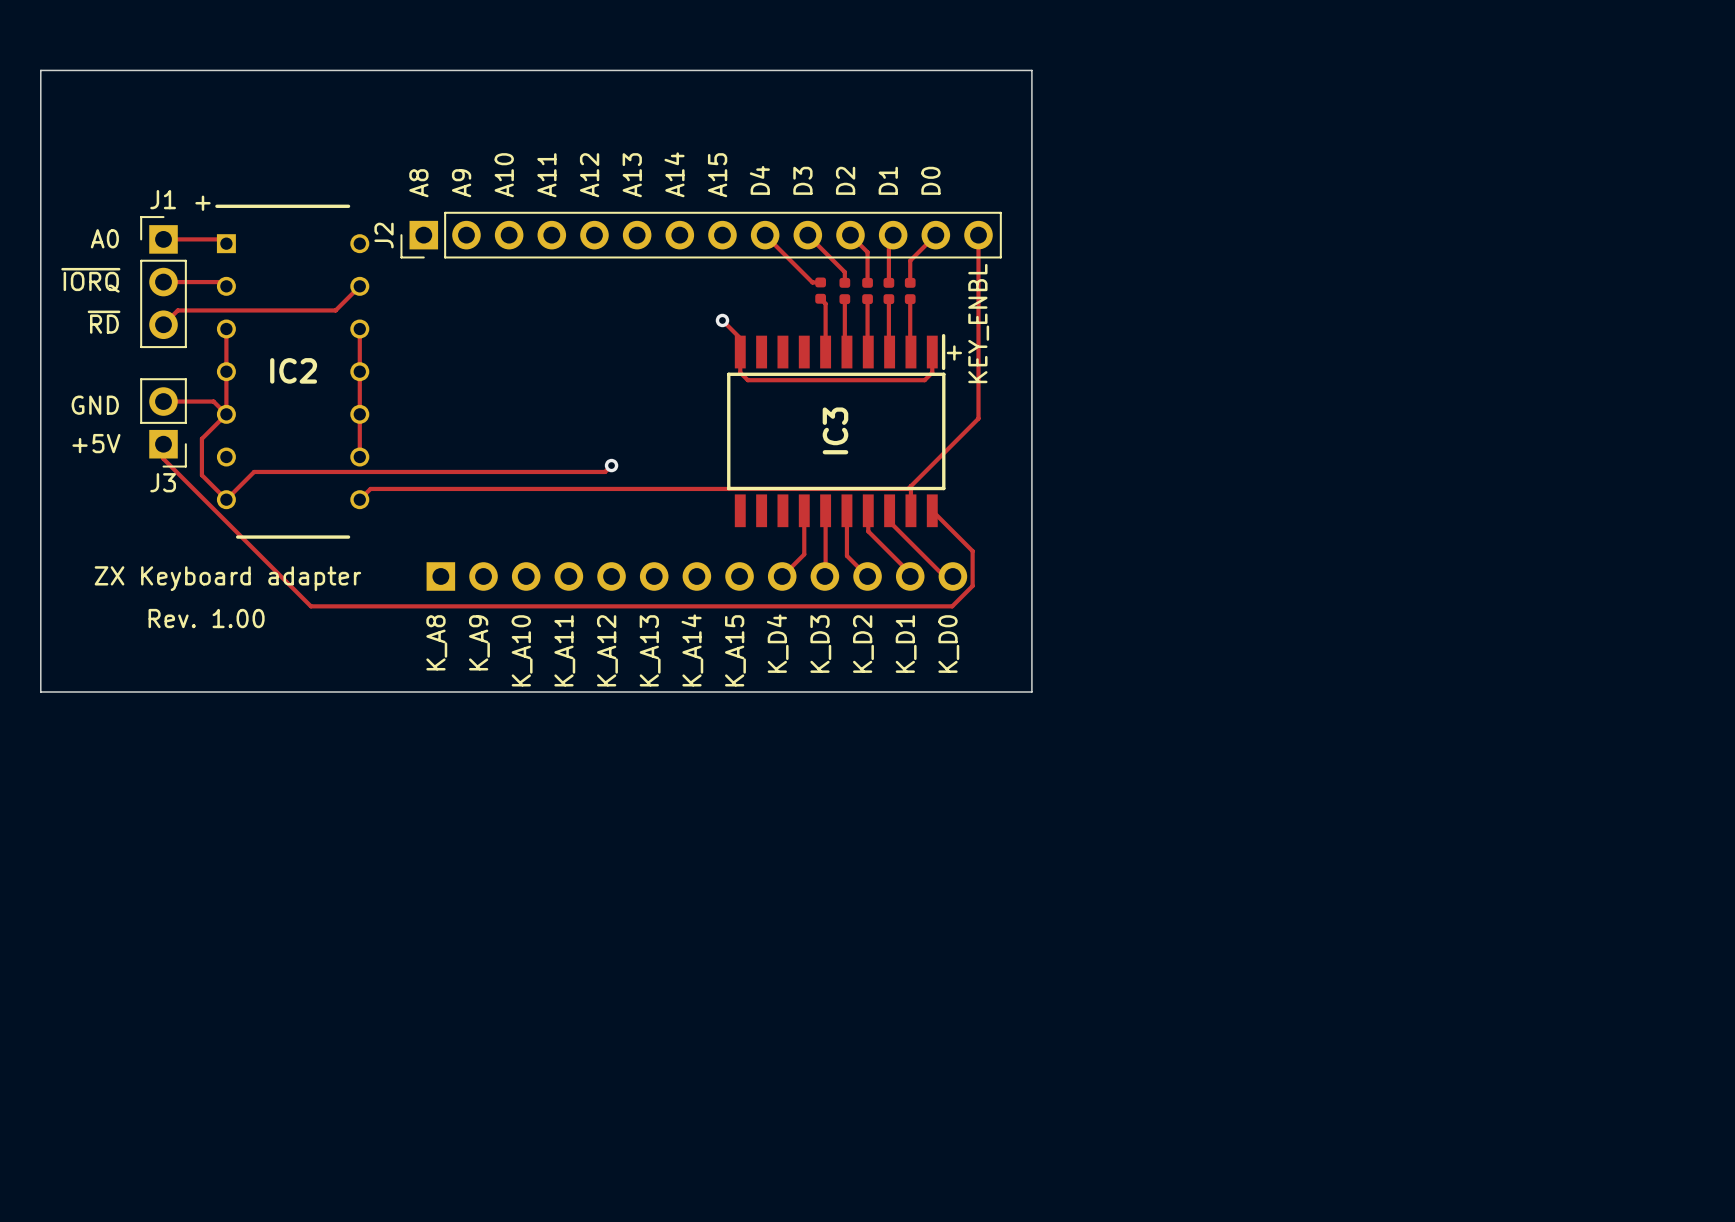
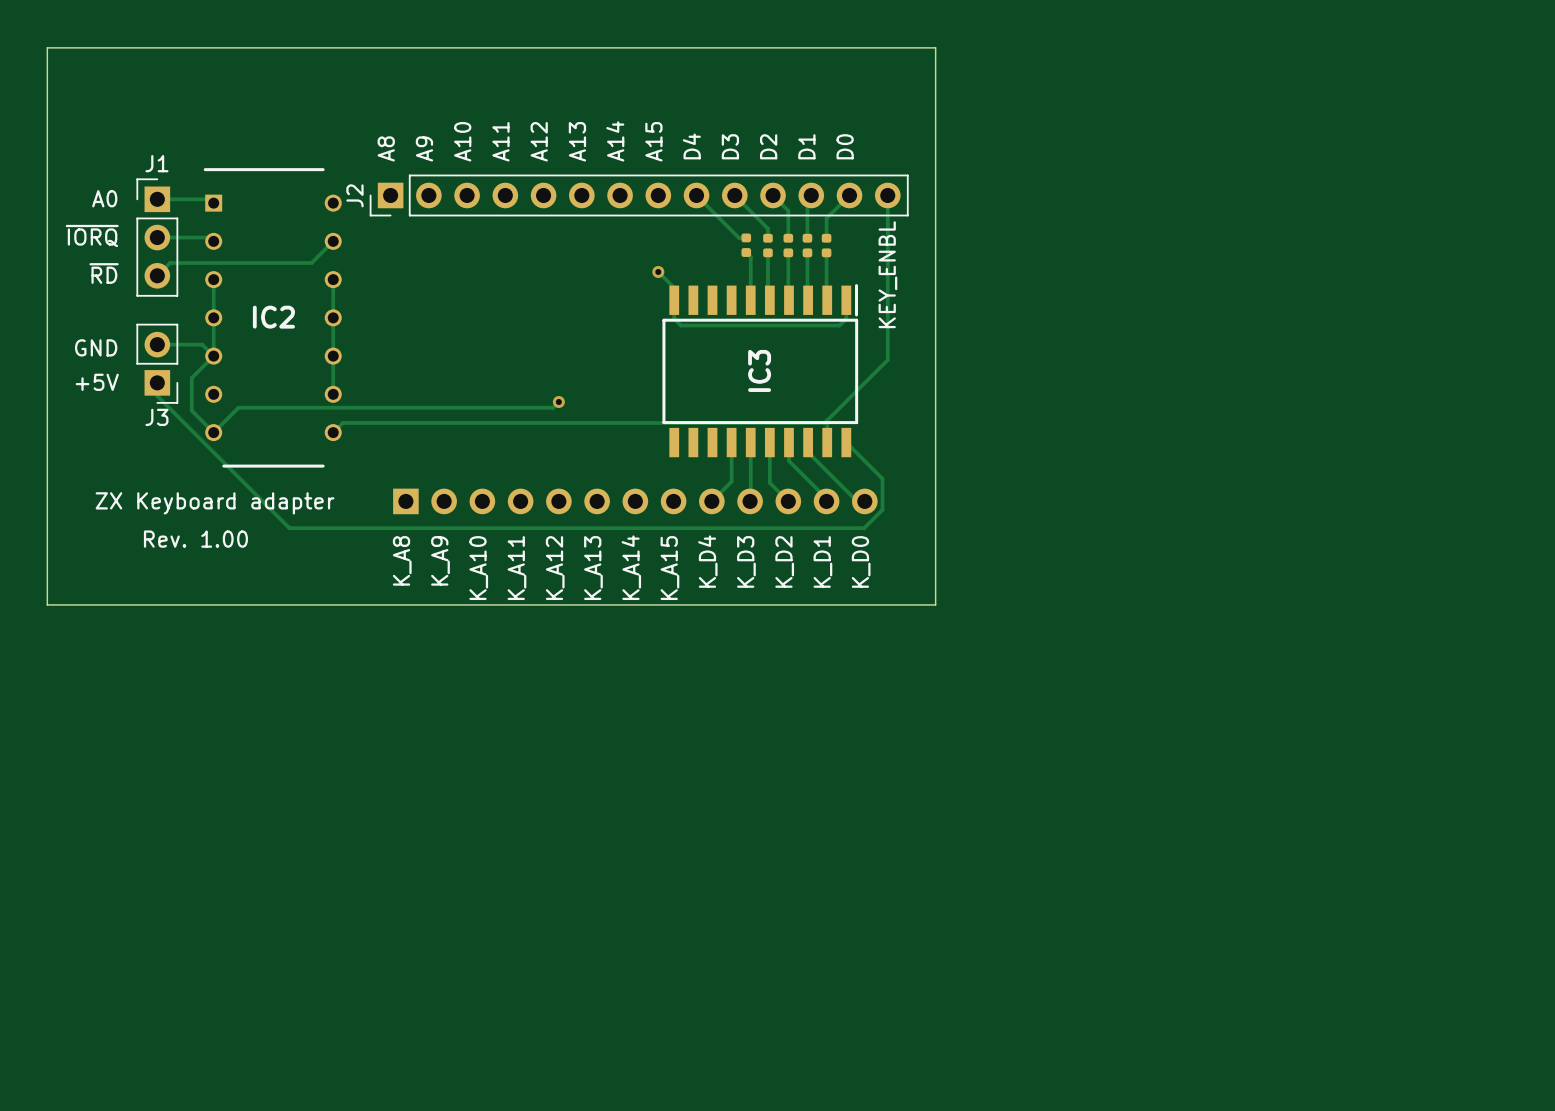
text: + (202, 203) -> none
text: + (954, 352) -> none

